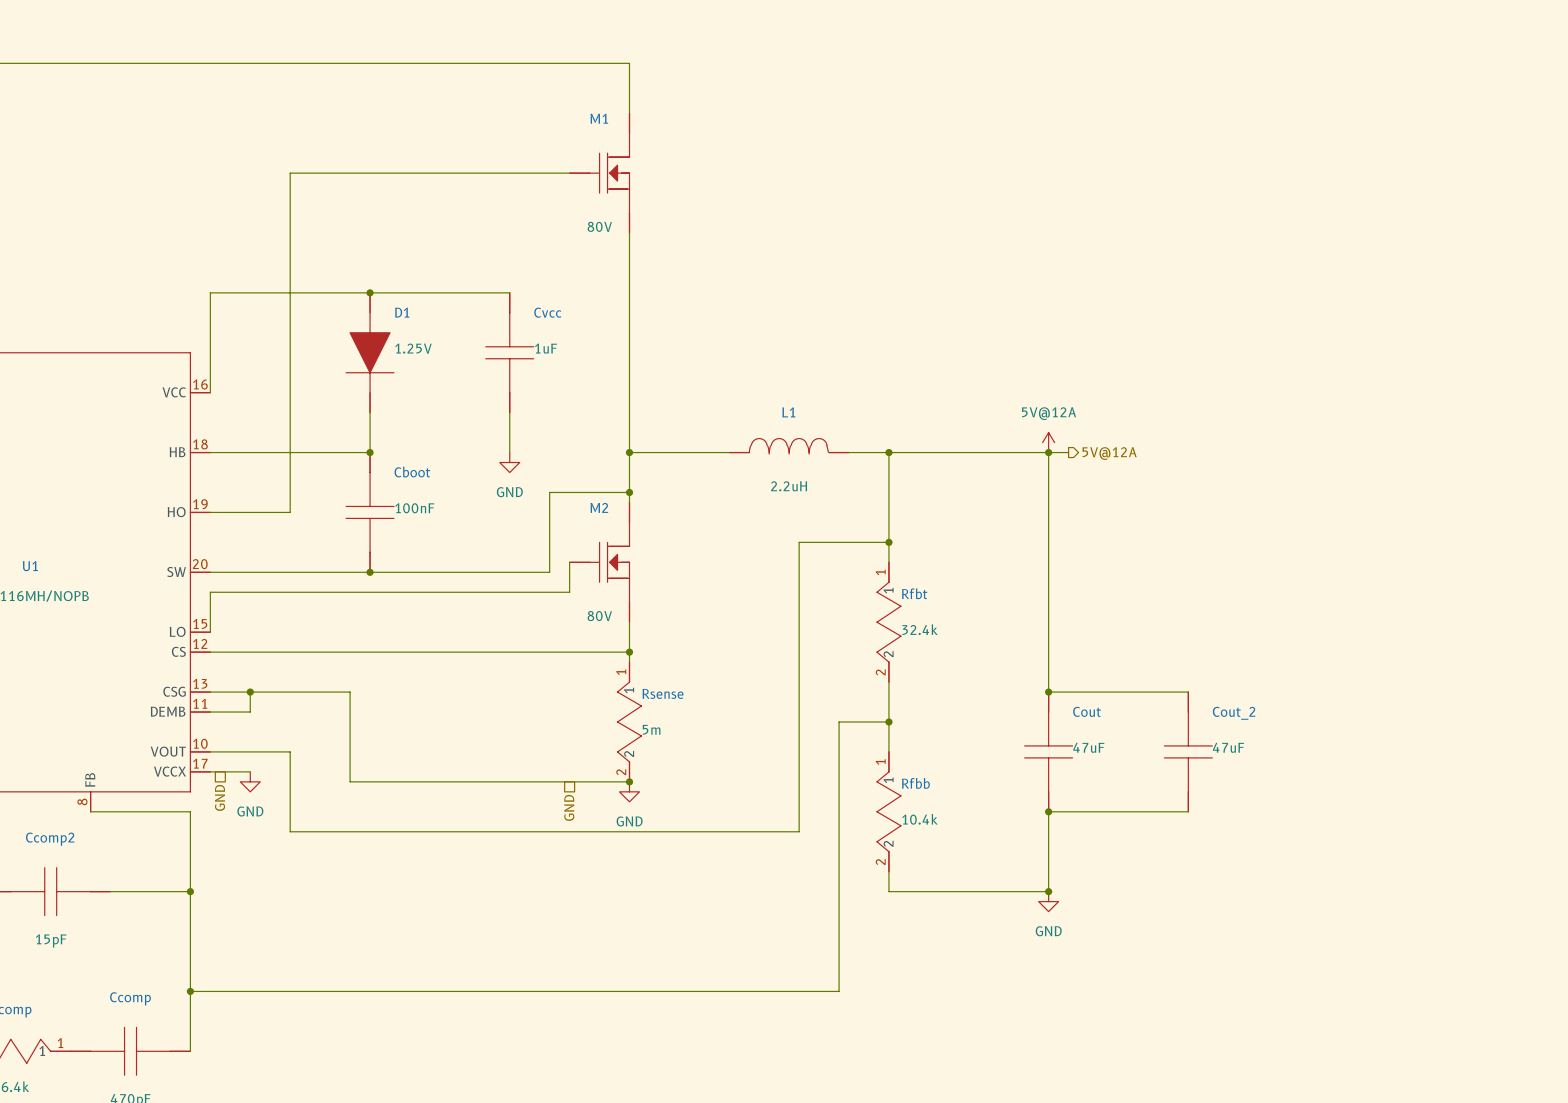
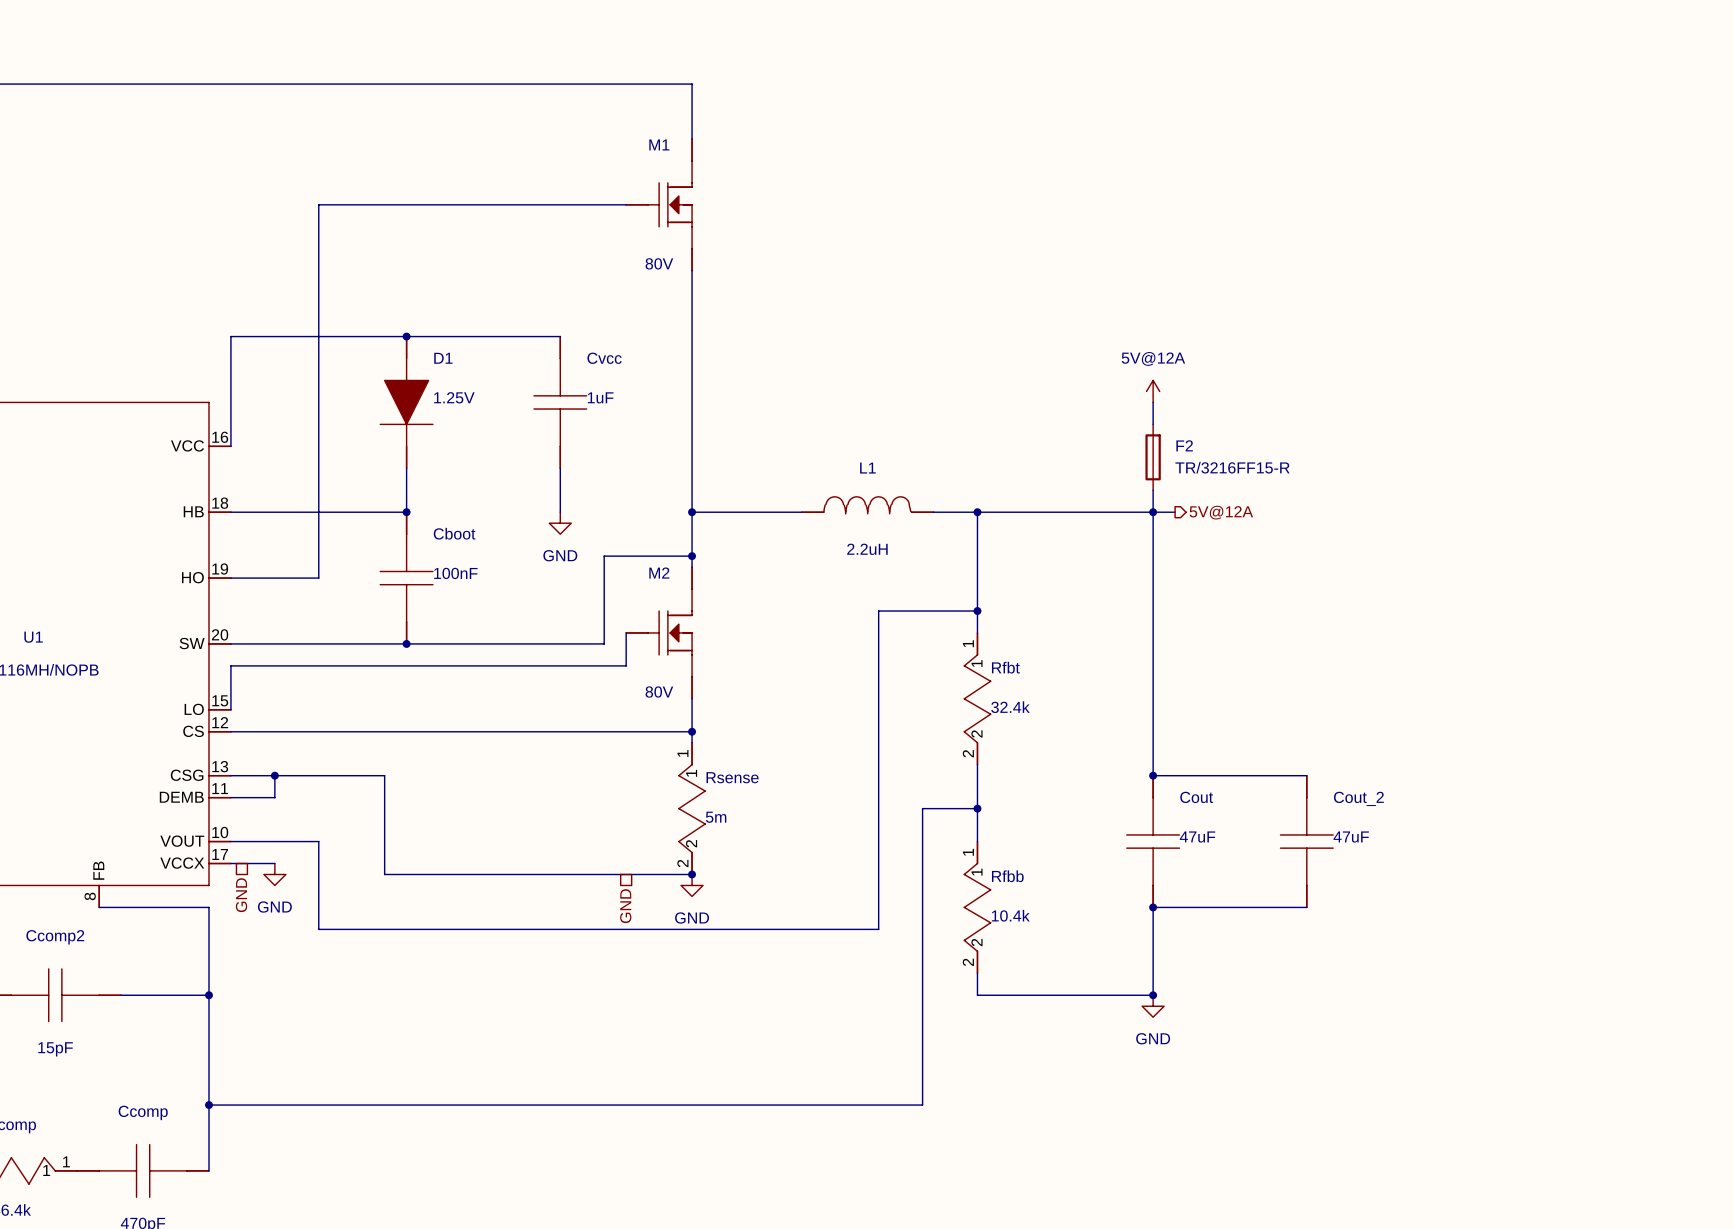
wire: none -> (1153, 402) (1153, 424)
F2: none -> TR/3216FF15-R (1153, 457)
power symbol position: 5V@12A (1048, 442) -> 5V@12A (1153, 391)

